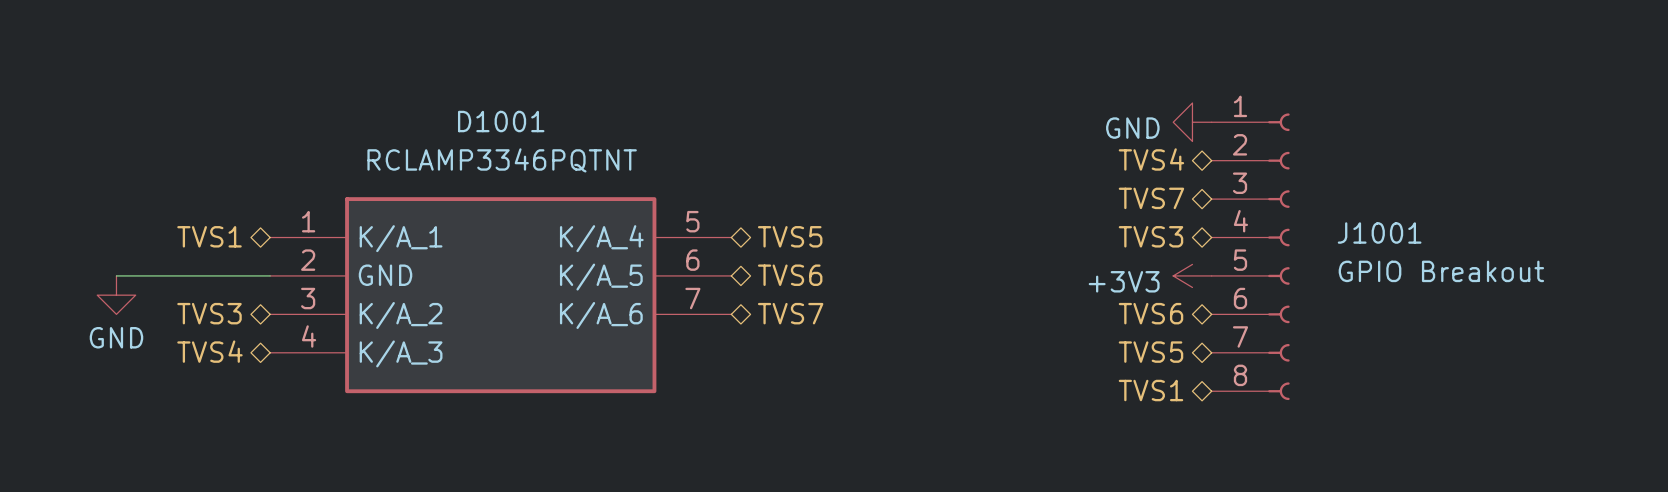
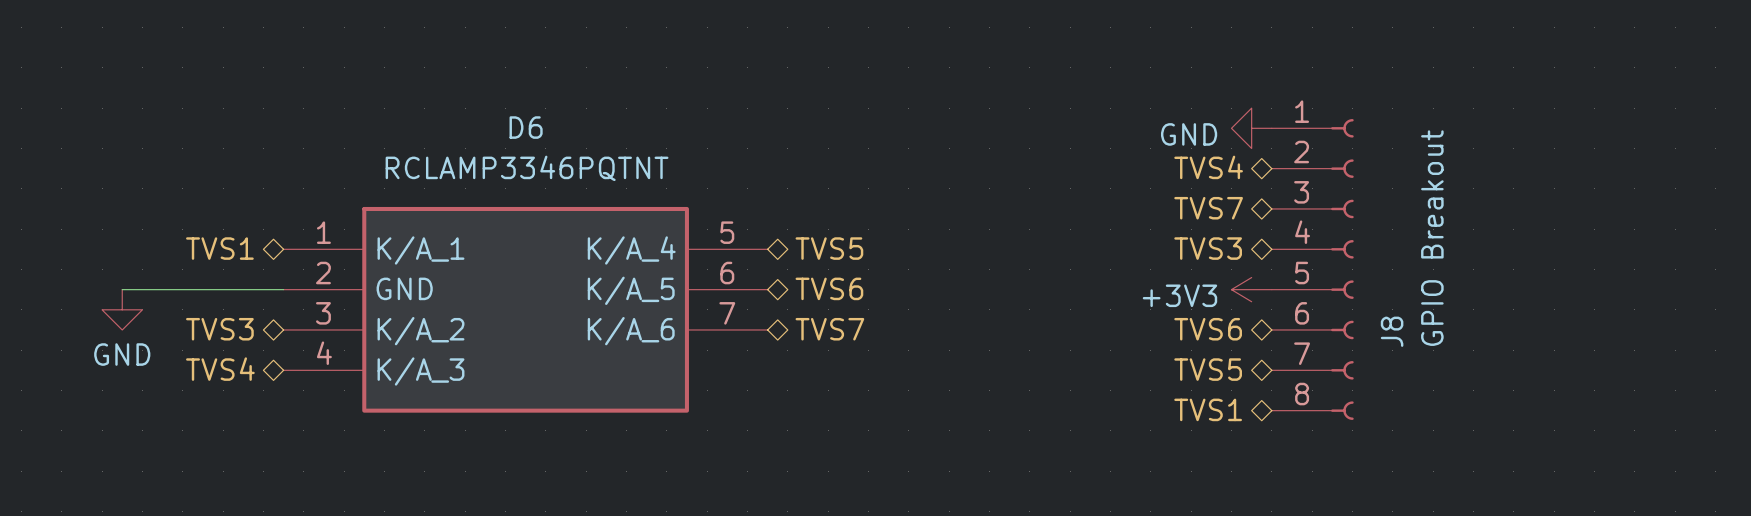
D1001 name: D1001 (501, 121) -> D6 (526, 127)
J1001 name: J1001 (1379, 233) -> J8 (1392, 331)
J1001 value rotation: 0° (1441, 271) -> 90° counterclockwise (1432, 238)

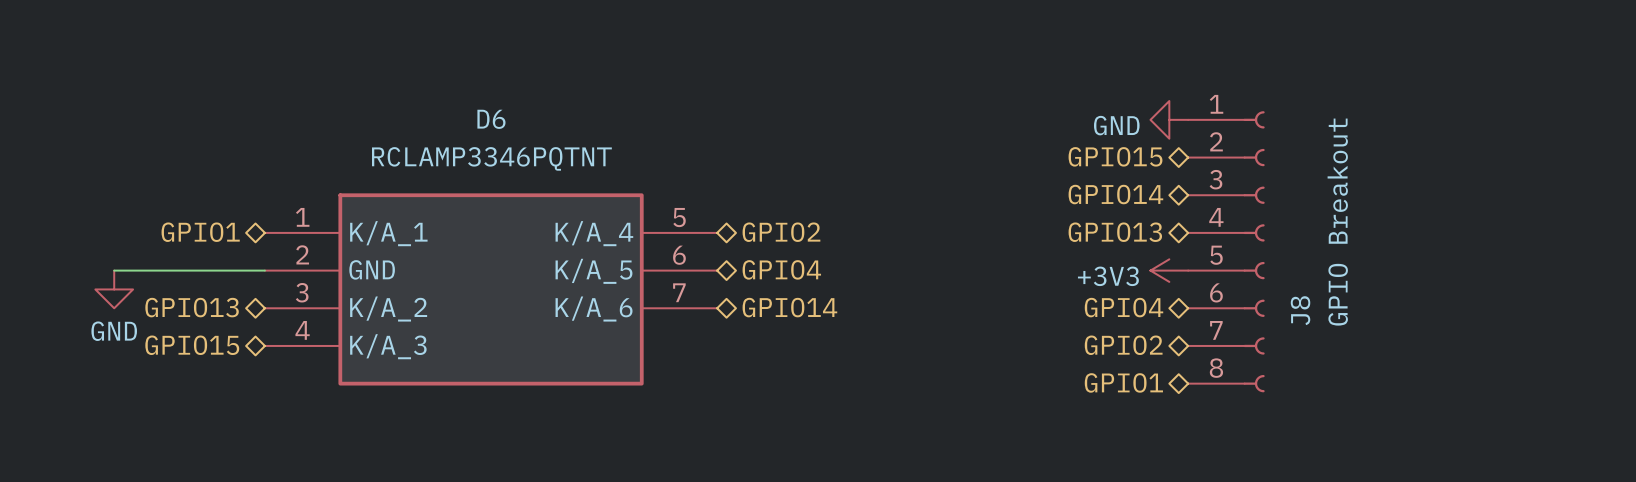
hierarchical label: TVS4 (1208, 167) -> GPIO15 (1115, 156)
hierarchical label: TVS7 (1208, 208) -> GPIO14 (1115, 194)
hierarchical label: TVS1 (219, 248) -> GPIO1 (200, 232)
hierarchical label: TVS5 (829, 248) -> GPIO2 (781, 232)
hierarchical label: TVS3 (1208, 248) -> GPIO13 (1115, 232)
hierarchical label: TVS6 (829, 288) -> GPIO4 (781, 269)
hierarchical label: TVS3 (219, 329) -> GPIO13 (192, 307)
hierarchical label: TVS7 (829, 329) -> GPIO14 (789, 307)
hierarchical label: TVS6 (1208, 329) -> GPIO4 (1123, 307)
hierarchical label: TVS4 (220, 369) -> GPIO15 (192, 345)
hierarchical label: TVS5 (1208, 369) -> GPIO2 (1123, 345)
hierarchical label: TVS1 (1208, 409) -> GPIO1 (1123, 382)

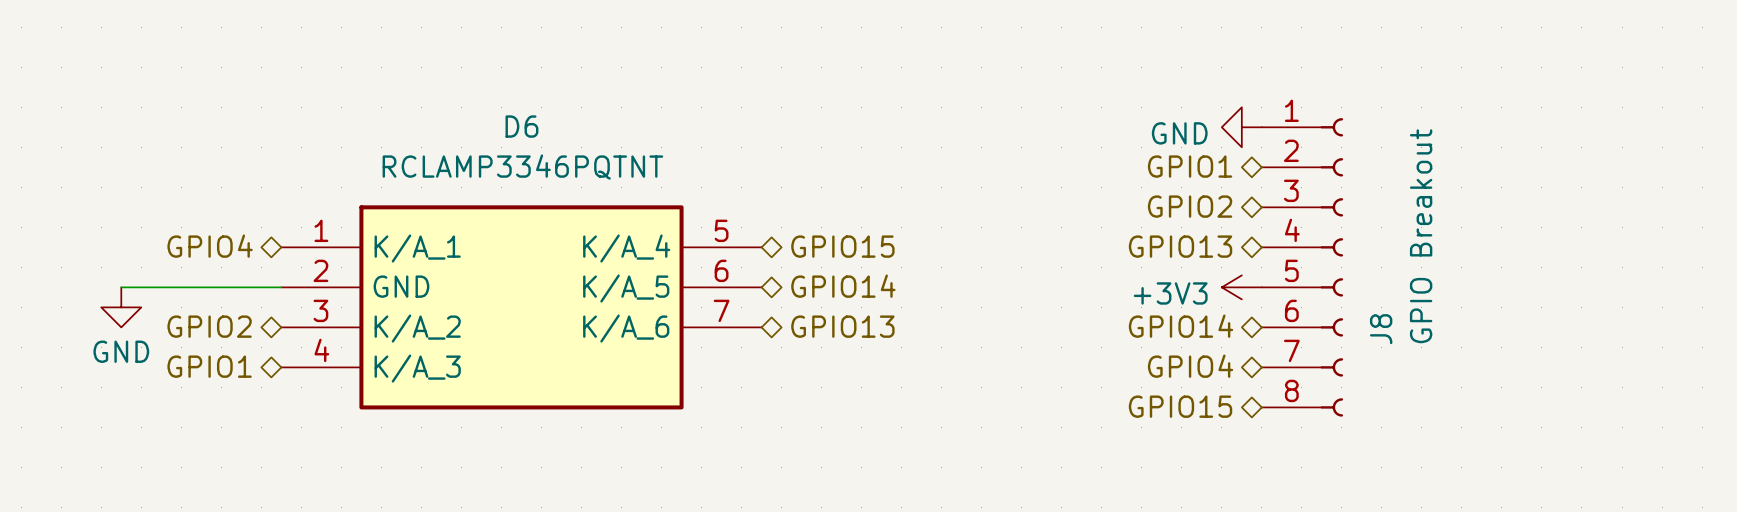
hierarchical label: GPIO15 (1115, 156) -> GPIO1 (1190, 166)
hierarchical label: GPIO14 (1115, 194) -> GPIO2 (1190, 206)
hierarchical label: GPIO1 (200, 232) -> GPIO4 (210, 246)
hierarchical label: GPIO2 (781, 232) -> GPIO15 (842, 246)
hierarchical label: GPIO4 (781, 269) -> GPIO14 (843, 286)
hierarchical label: GPIO13 (192, 307) -> GPIO2 (209, 326)
hierarchical label: GPIO14 (789, 307) -> GPIO13 (842, 326)
hierarchical label: GPIO4 (1123, 307) -> GPIO14 (1181, 326)
hierarchical label: GPIO15 (192, 345) -> GPIO1 (209, 366)
hierarchical label: GPIO2 (1123, 345) -> GPIO4 (1190, 366)
hierarchical label: GPIO1 (1123, 382) -> GPIO15 (1180, 406)

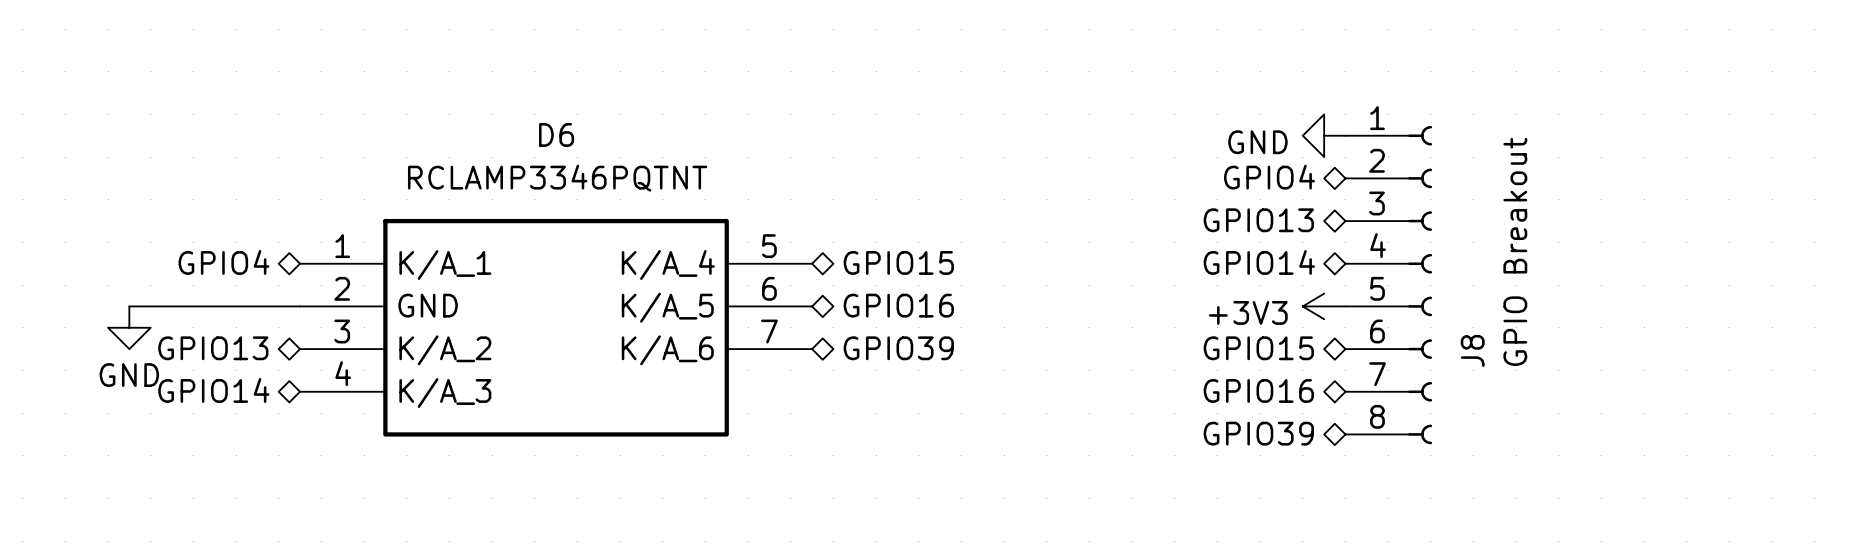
hierarchical label: GPIO1 (1190, 166) -> GPIO4 (1269, 177)
hierarchical label: GPIO2 (1190, 206) -> GPIO13 (1258, 220)
hierarchical label: GPIO13 (1180, 246) -> GPIO14 (1259, 262)
hierarchical label: GPIO14 (843, 286) -> GPIO16 (898, 305)
hierarchical label: GPIO2 (209, 326) -> GPIO13 (213, 348)
hierarchical label: GPIO13 (842, 326) -> GPIO39 (898, 348)
hierarchical label: GPIO14 (1181, 326) -> GPIO15 (1258, 348)
hierarchical label: GPIO1 (209, 366) -> GPIO14 (213, 390)
hierarchical label: GPIO4 (1190, 366) -> GPIO16 (1258, 390)
hierarchical label: GPIO15 (1180, 406) -> GPIO39 (1258, 433)

